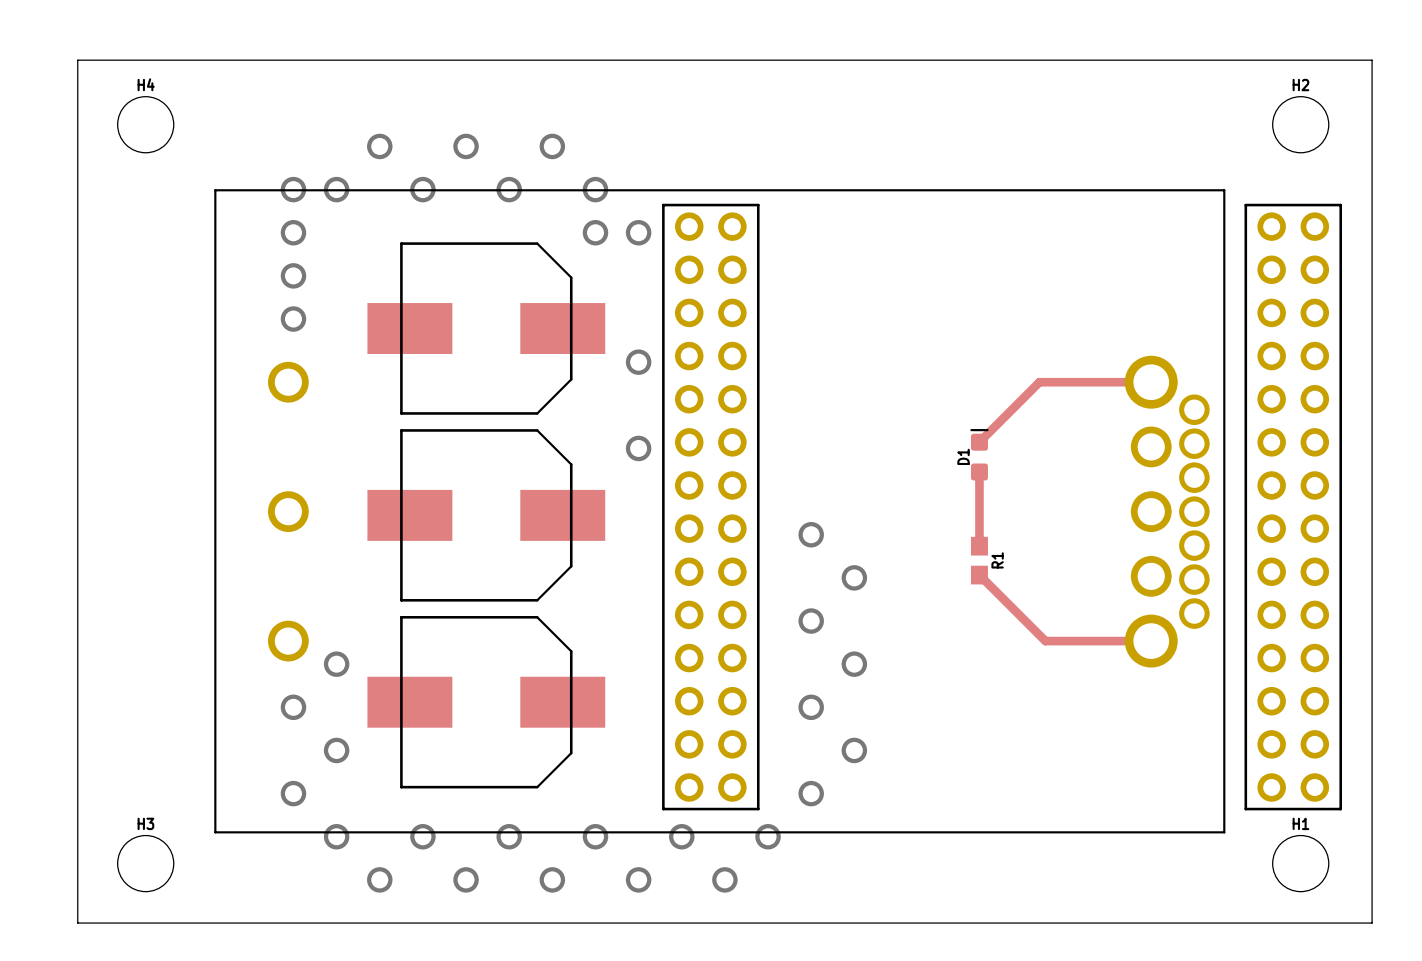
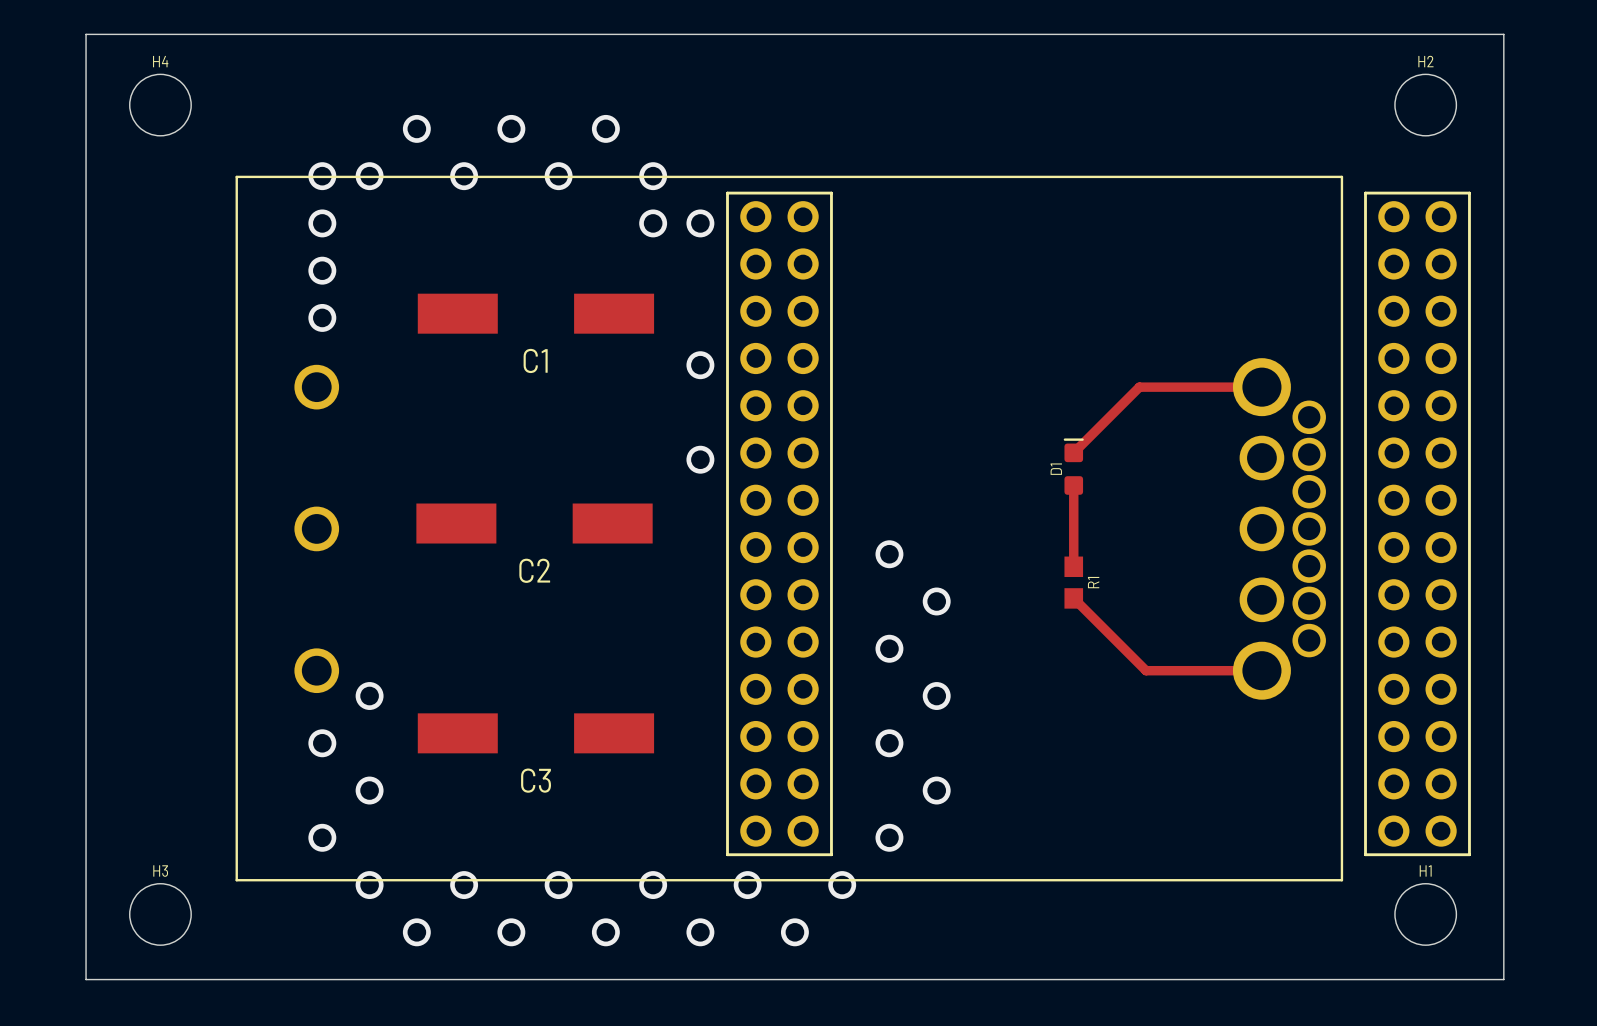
C1: none -> (535, 313)
part: (486, 328) -> none
C2: none -> (534, 523)
part: (486, 515) -> none
C3: none -> (535, 733)
part: (486, 702) -> none

